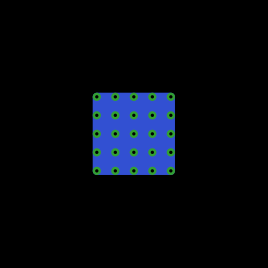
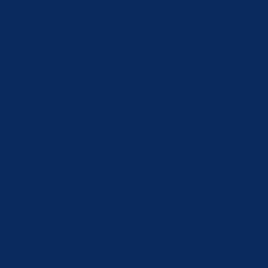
part: (133, 133) -> none

